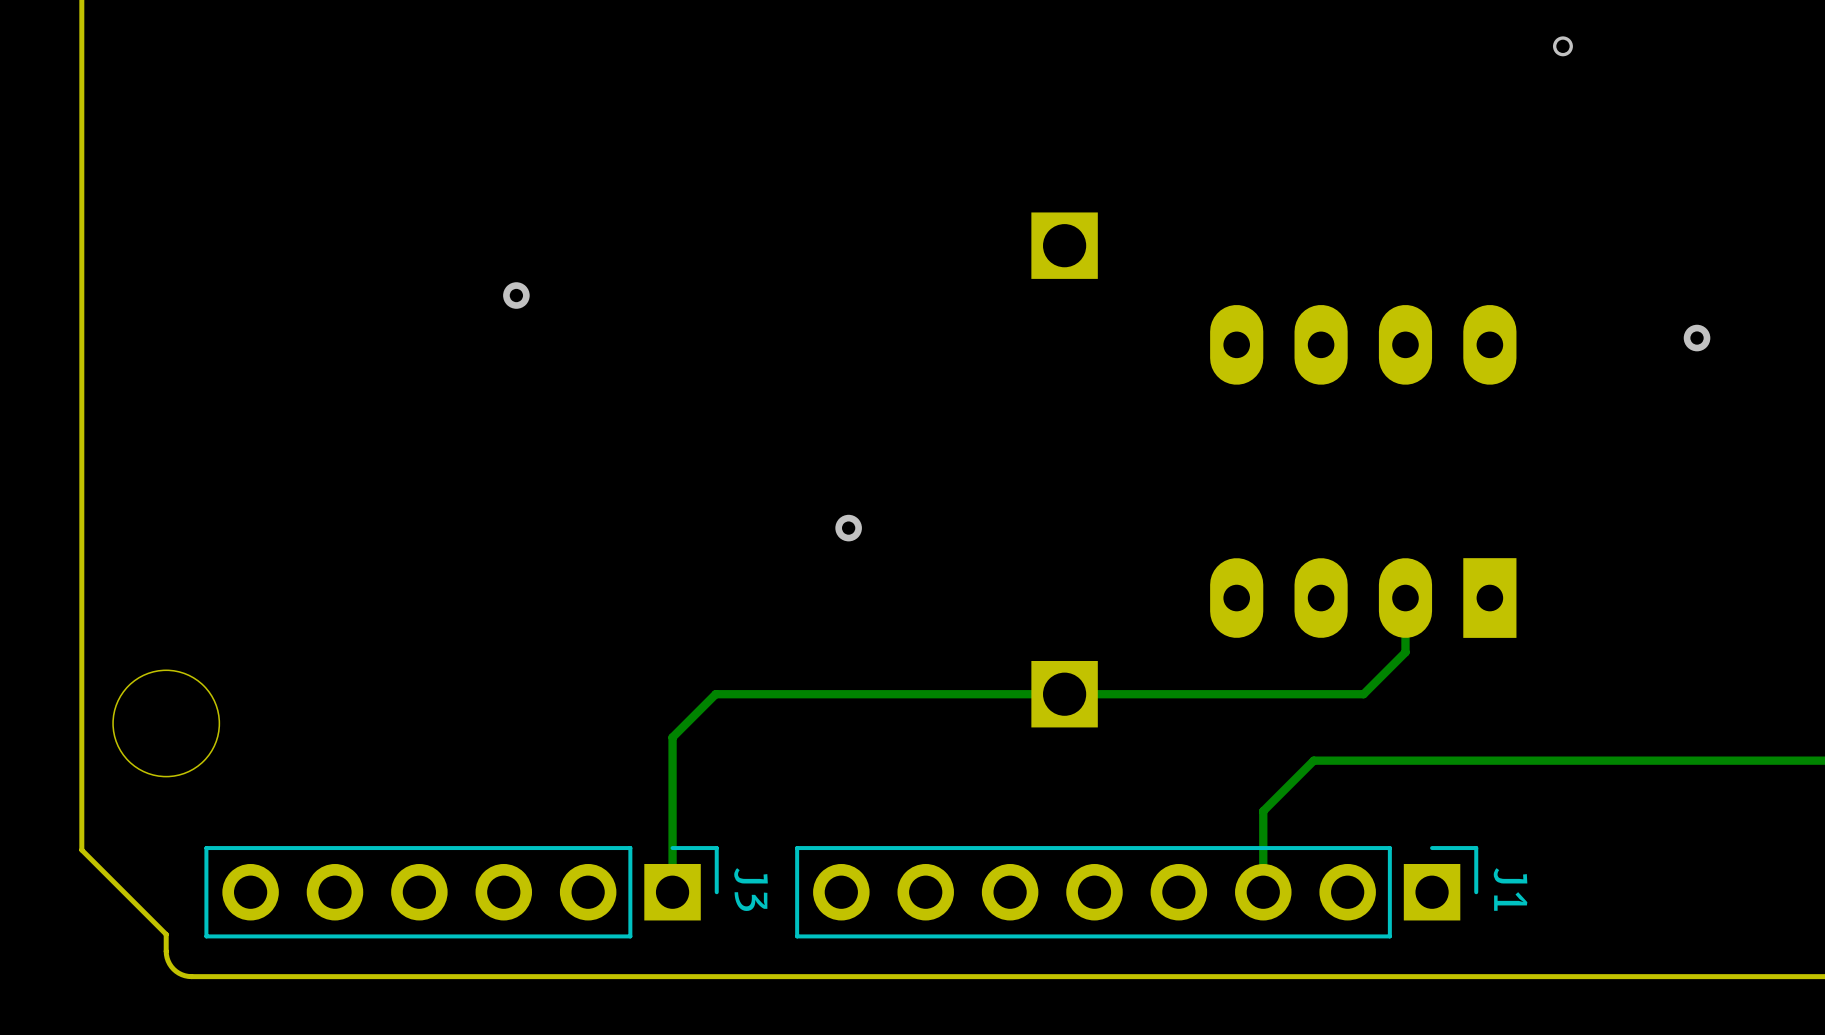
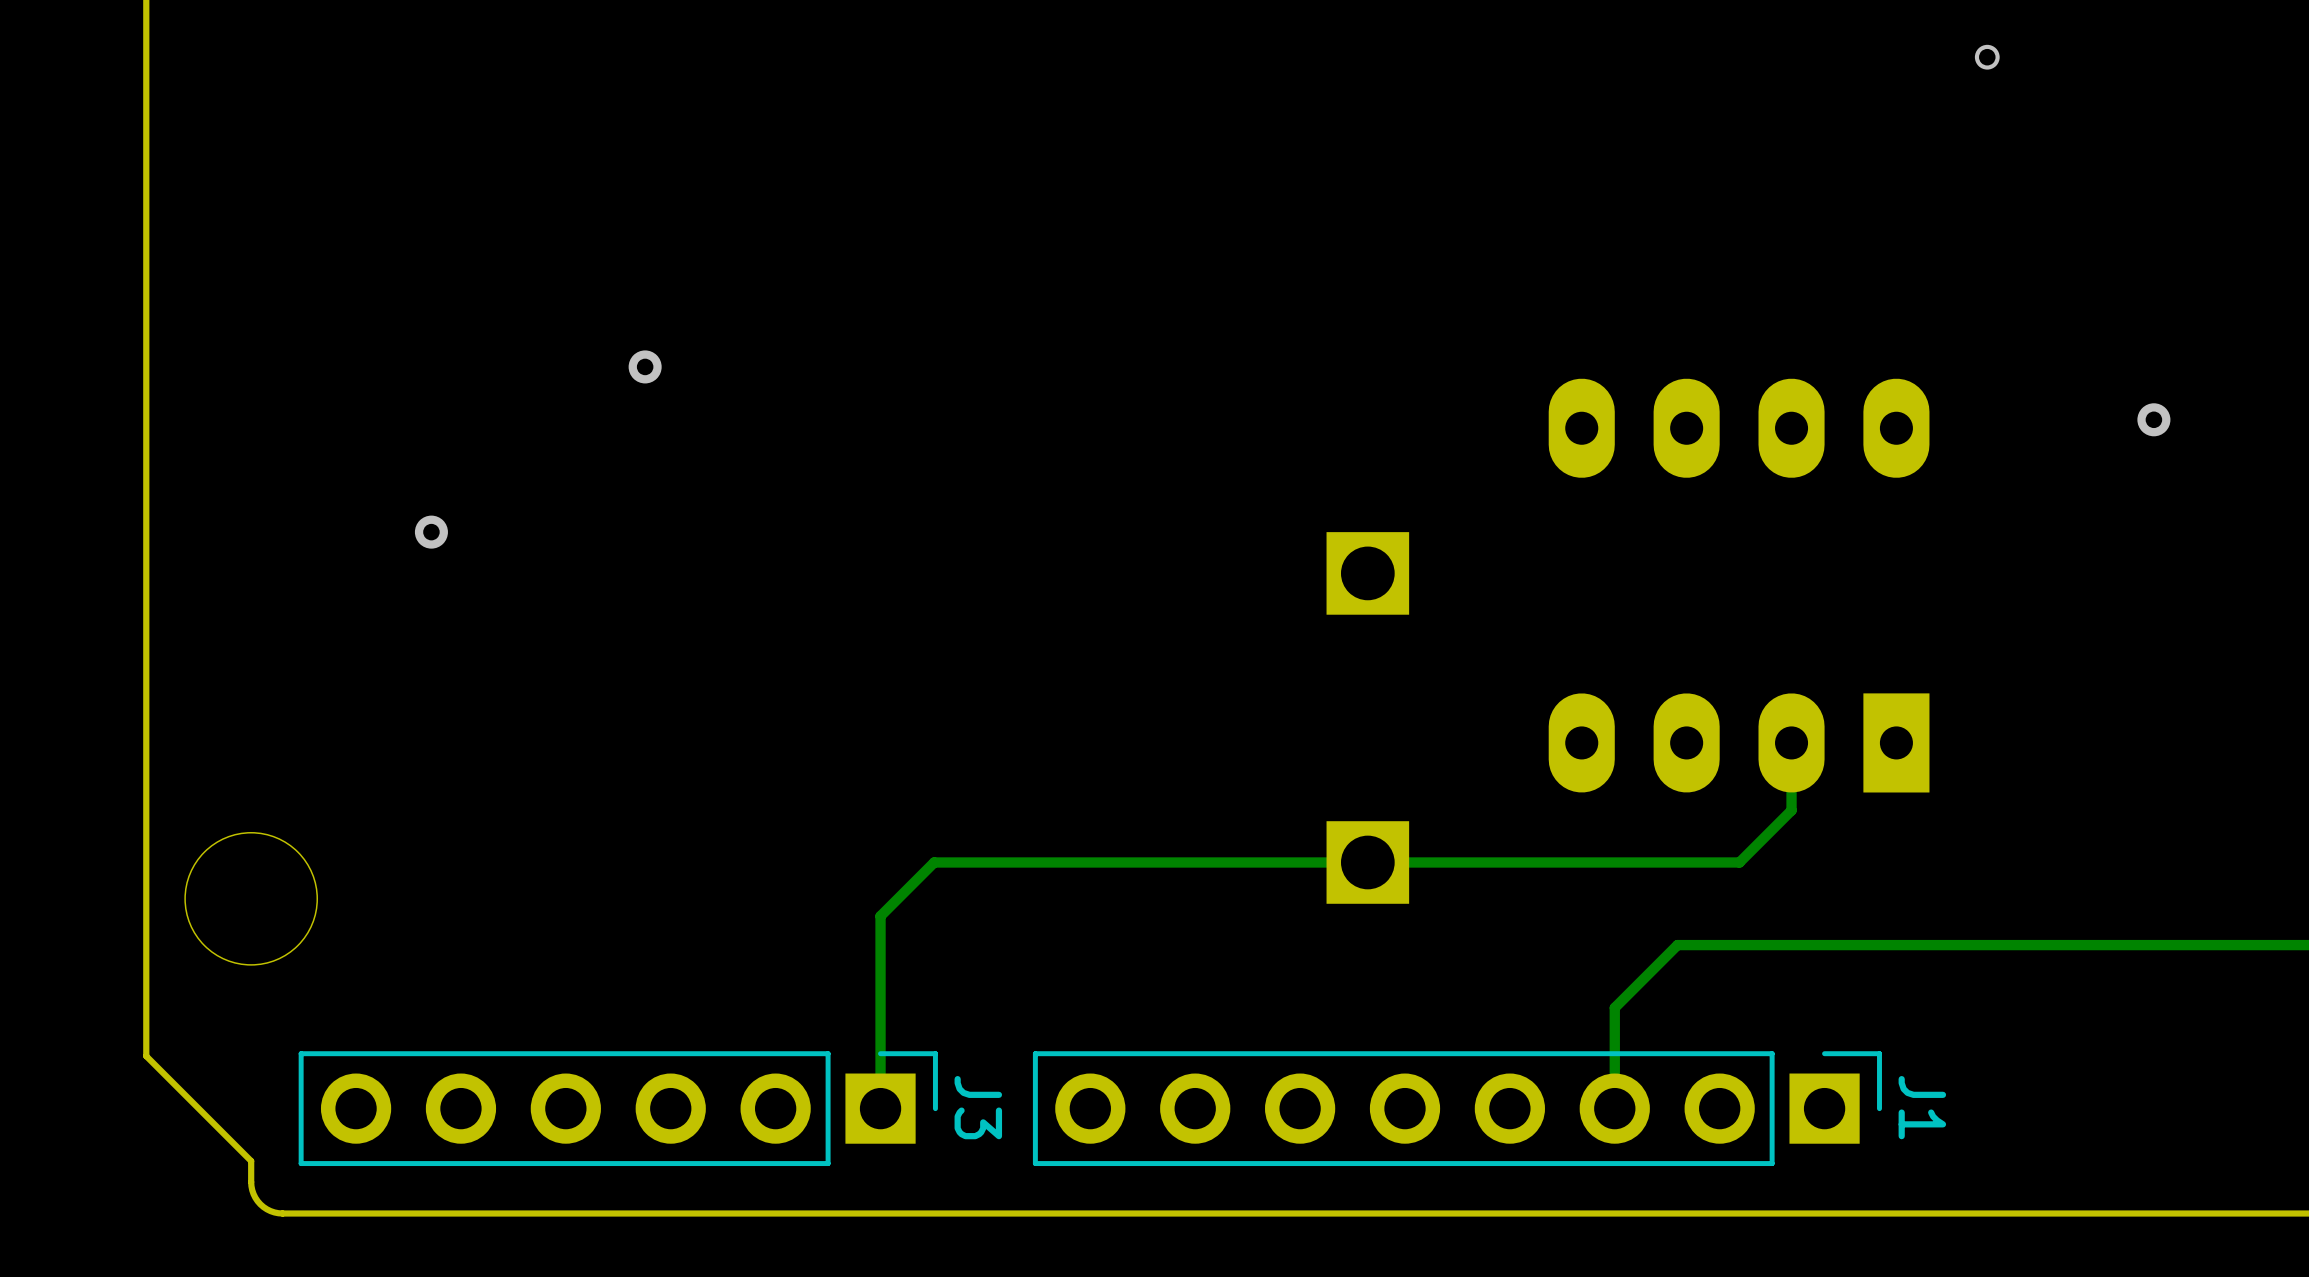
part position: (1064, 245) -> (1367, 573)
via position: (516, 295) -> (645, 366)
via: none -> (431, 532)
via: (848, 528) -> none

